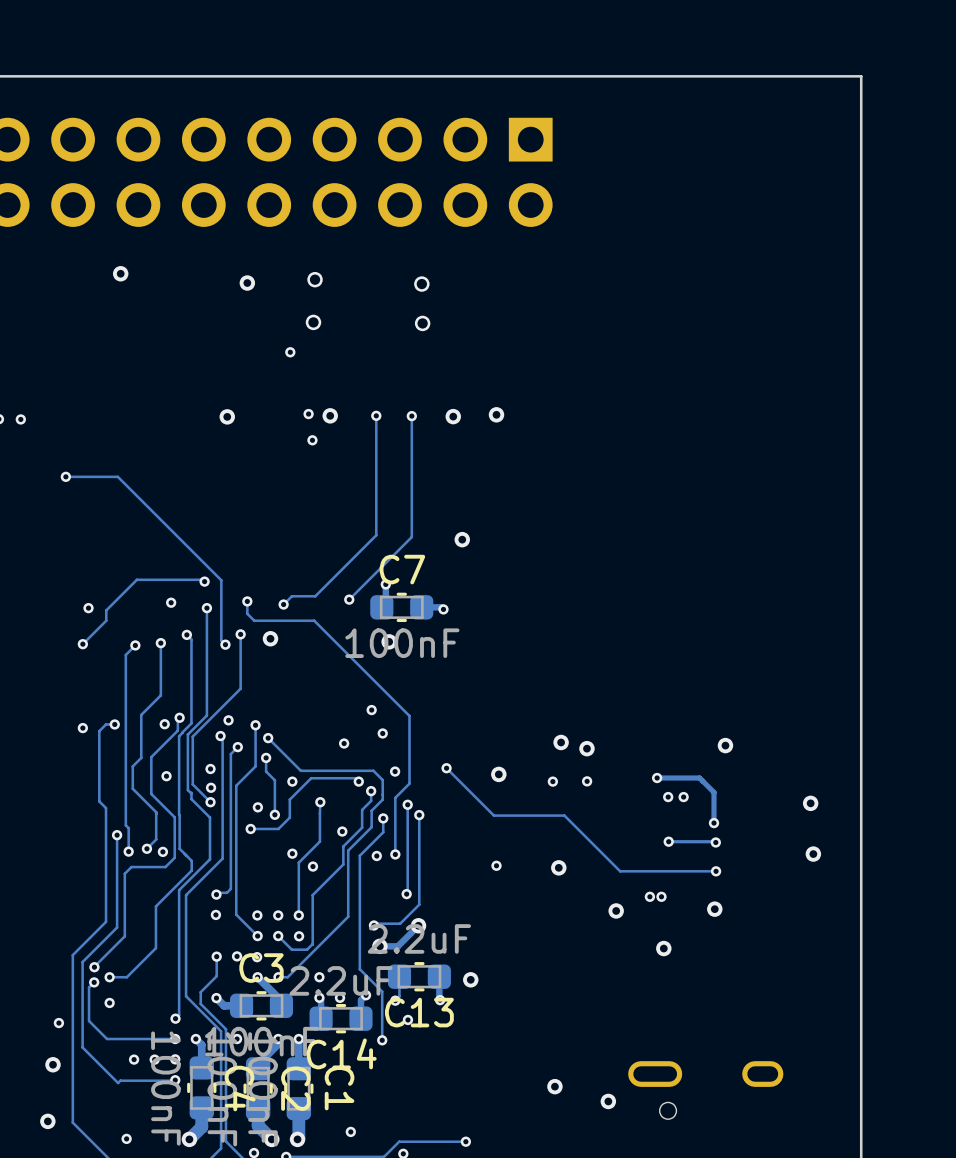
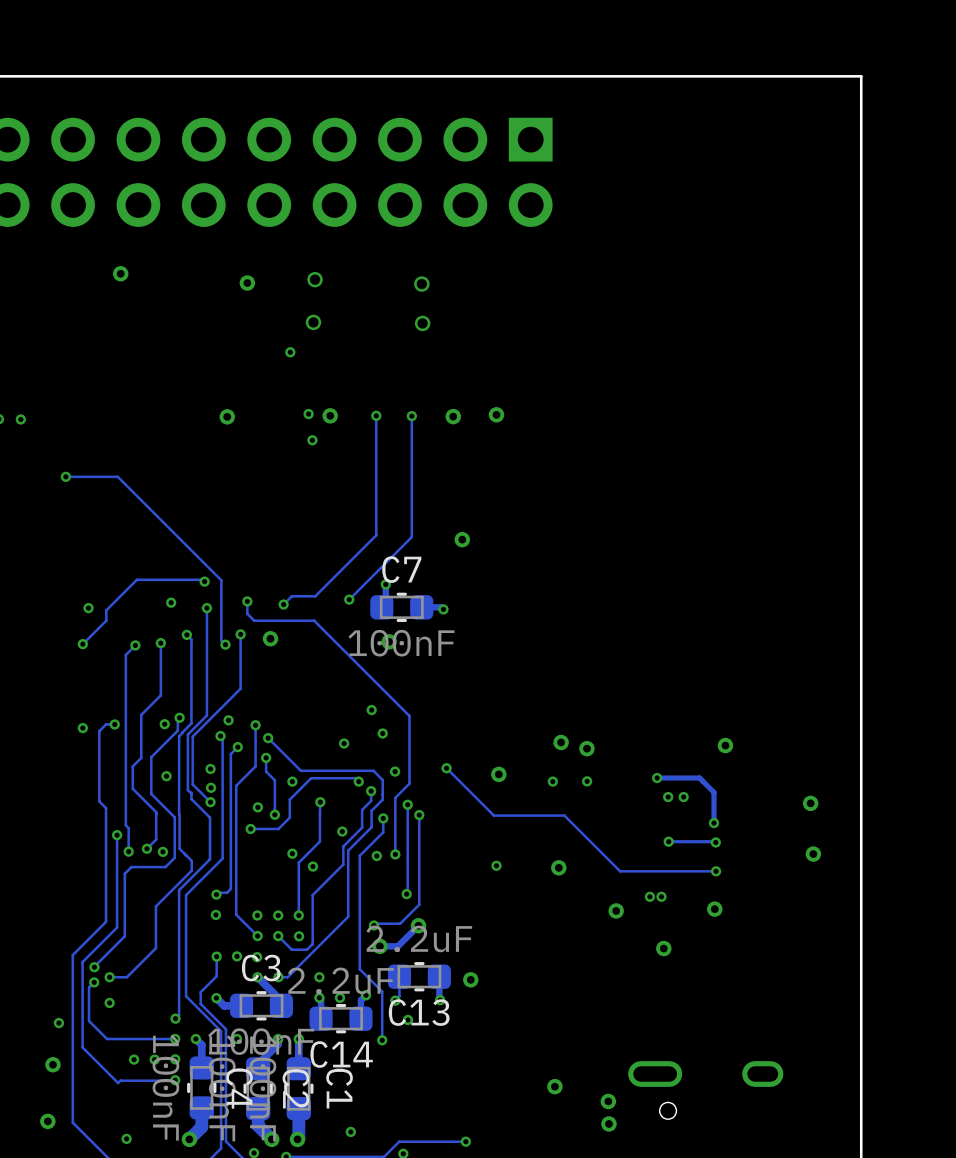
via: none -> (608, 1123)

